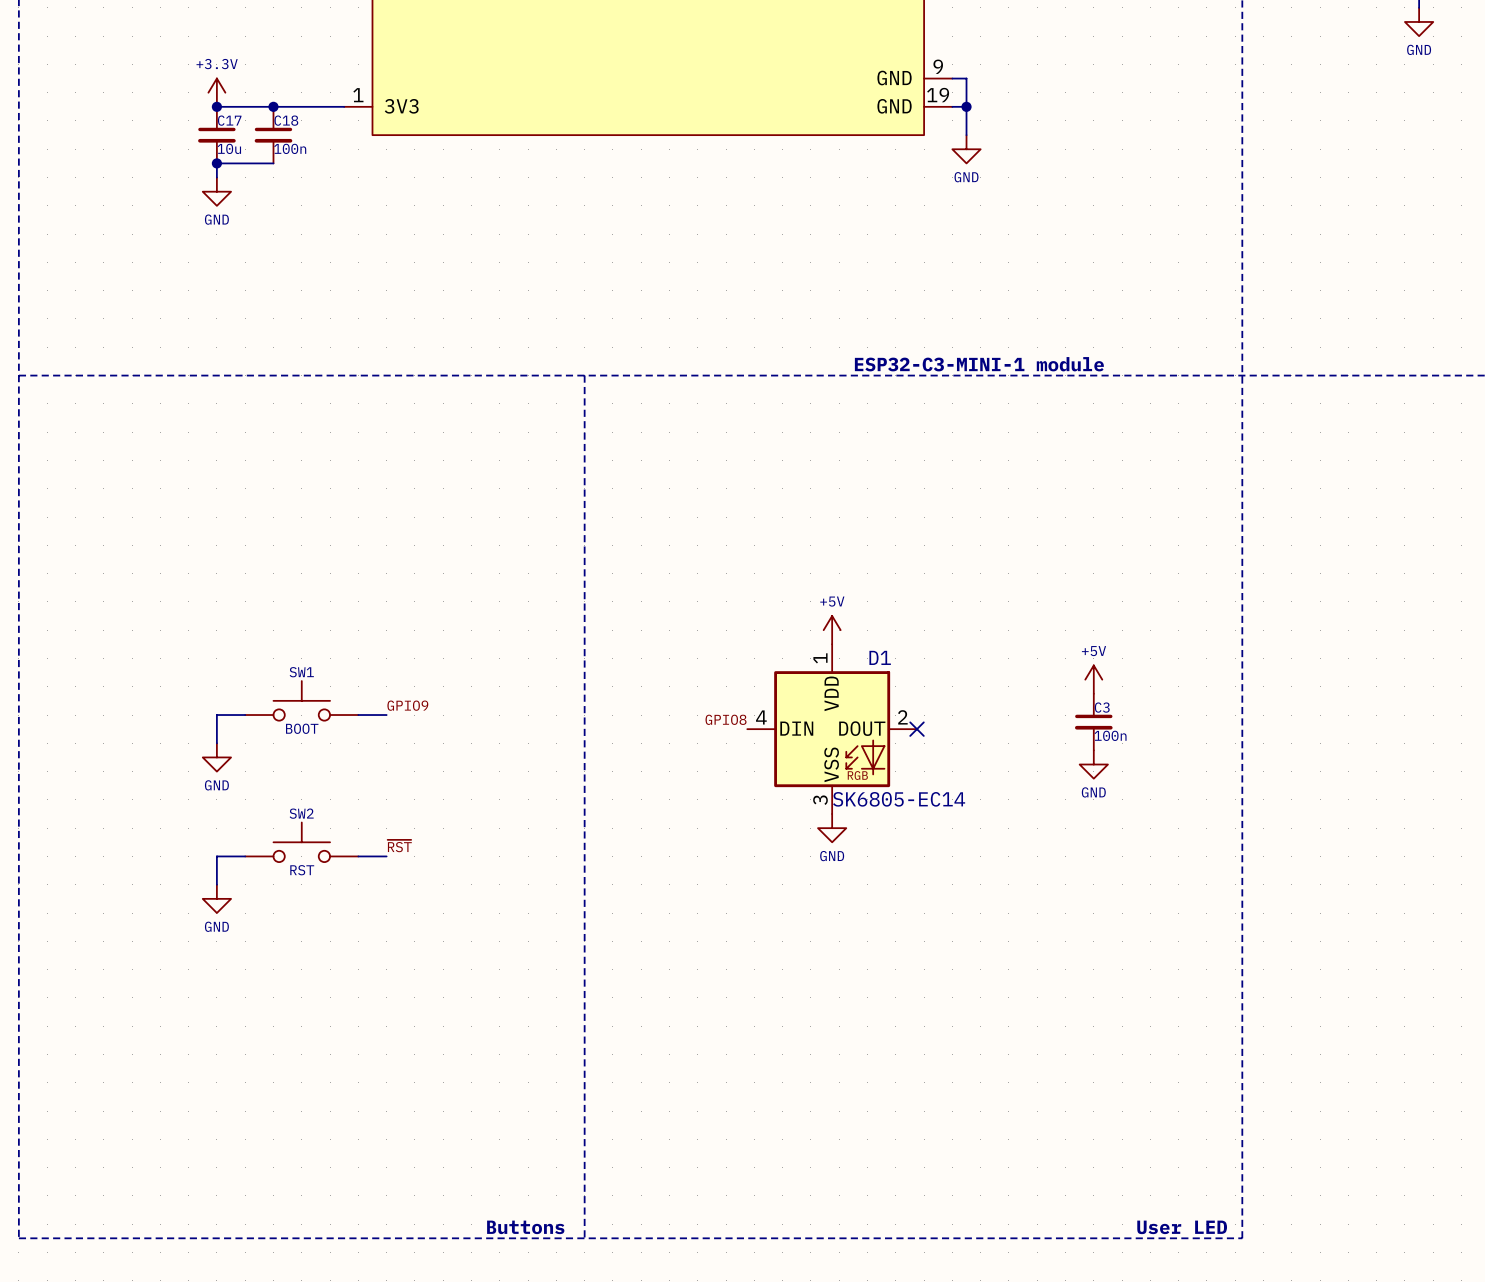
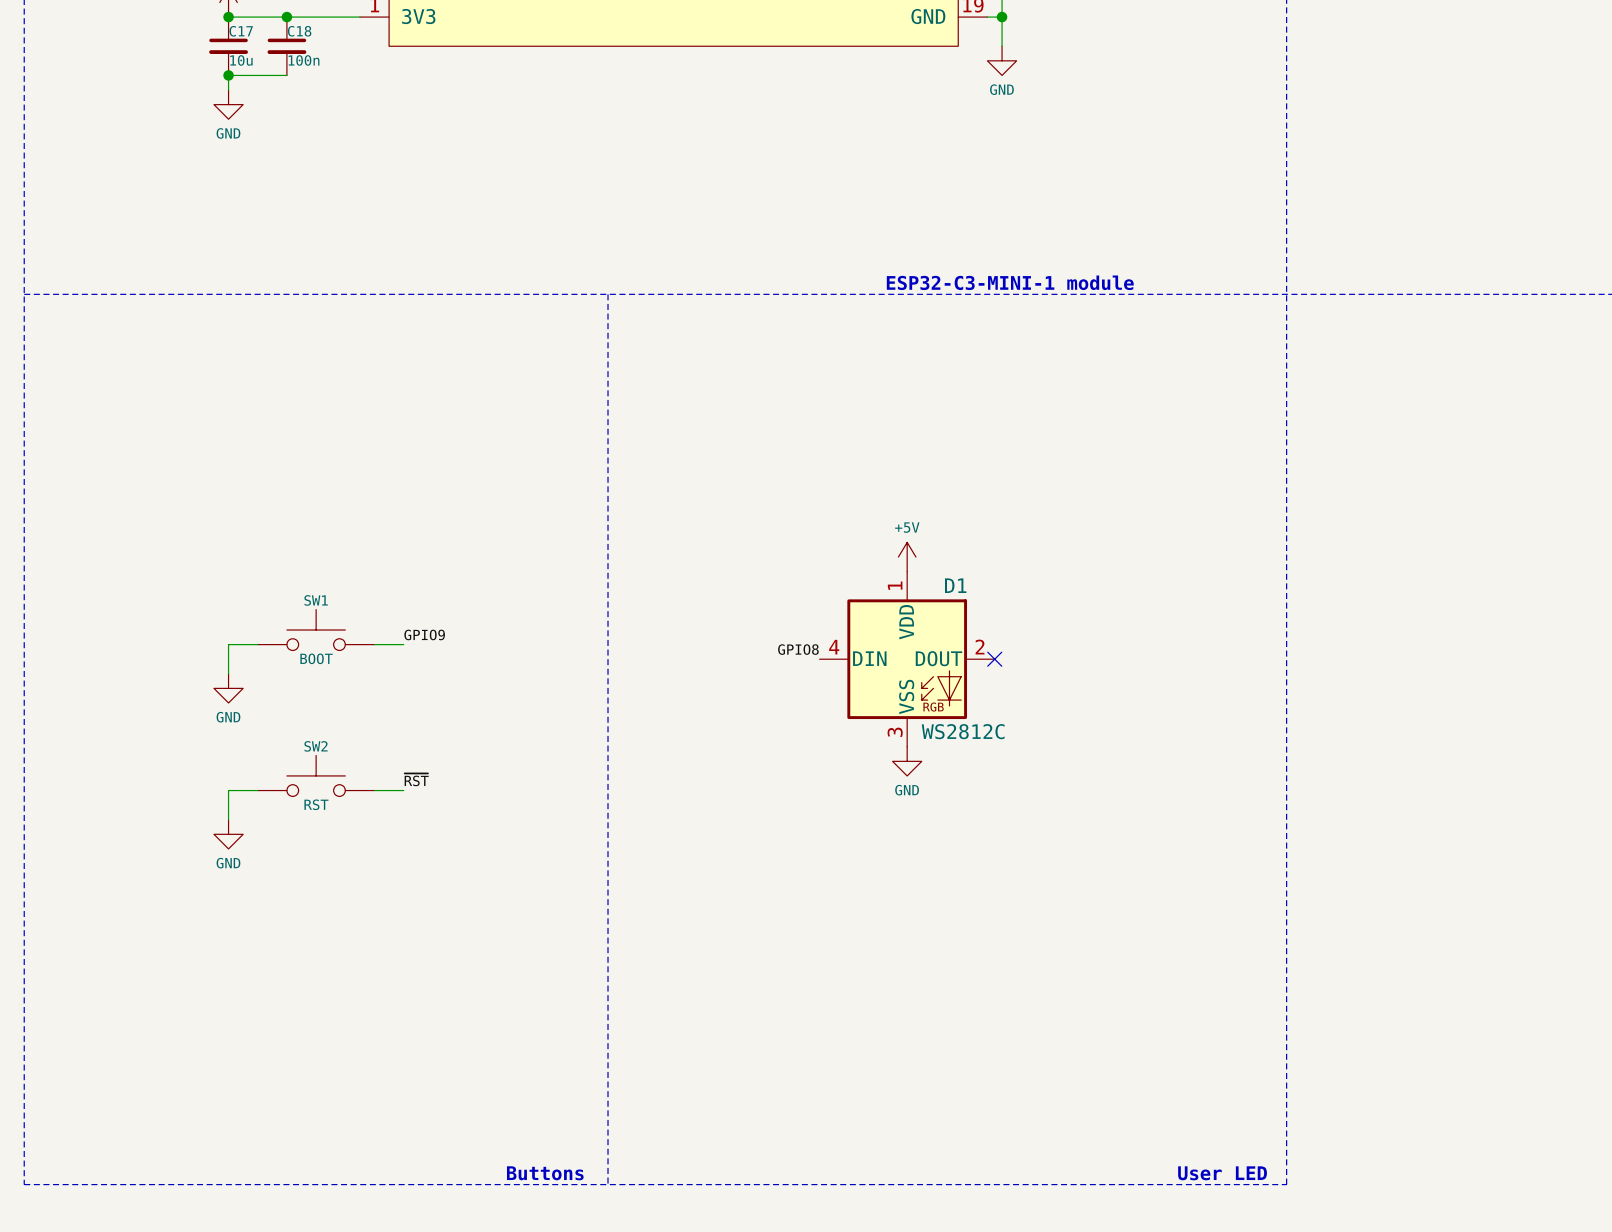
power symbol position: +5V (832, 630) -> +5V (907, 557)
power symbol: +5V (1093, 679) -> none
label position: GPIO8 (726, 719) -> GPIO8 (798, 649)
C3: 100n (1093, 722) -> none
D1 position: (832, 729) -> (907, 659)
no-connect mark position: (917, 729) -> (994, 659)
power symbol: GND (1093, 764) -> none
D1 value: SK6805-EC14 (899, 799) -> WS2812C (963, 731)
power symbol position: GND (832, 828) -> GND (907, 761)

